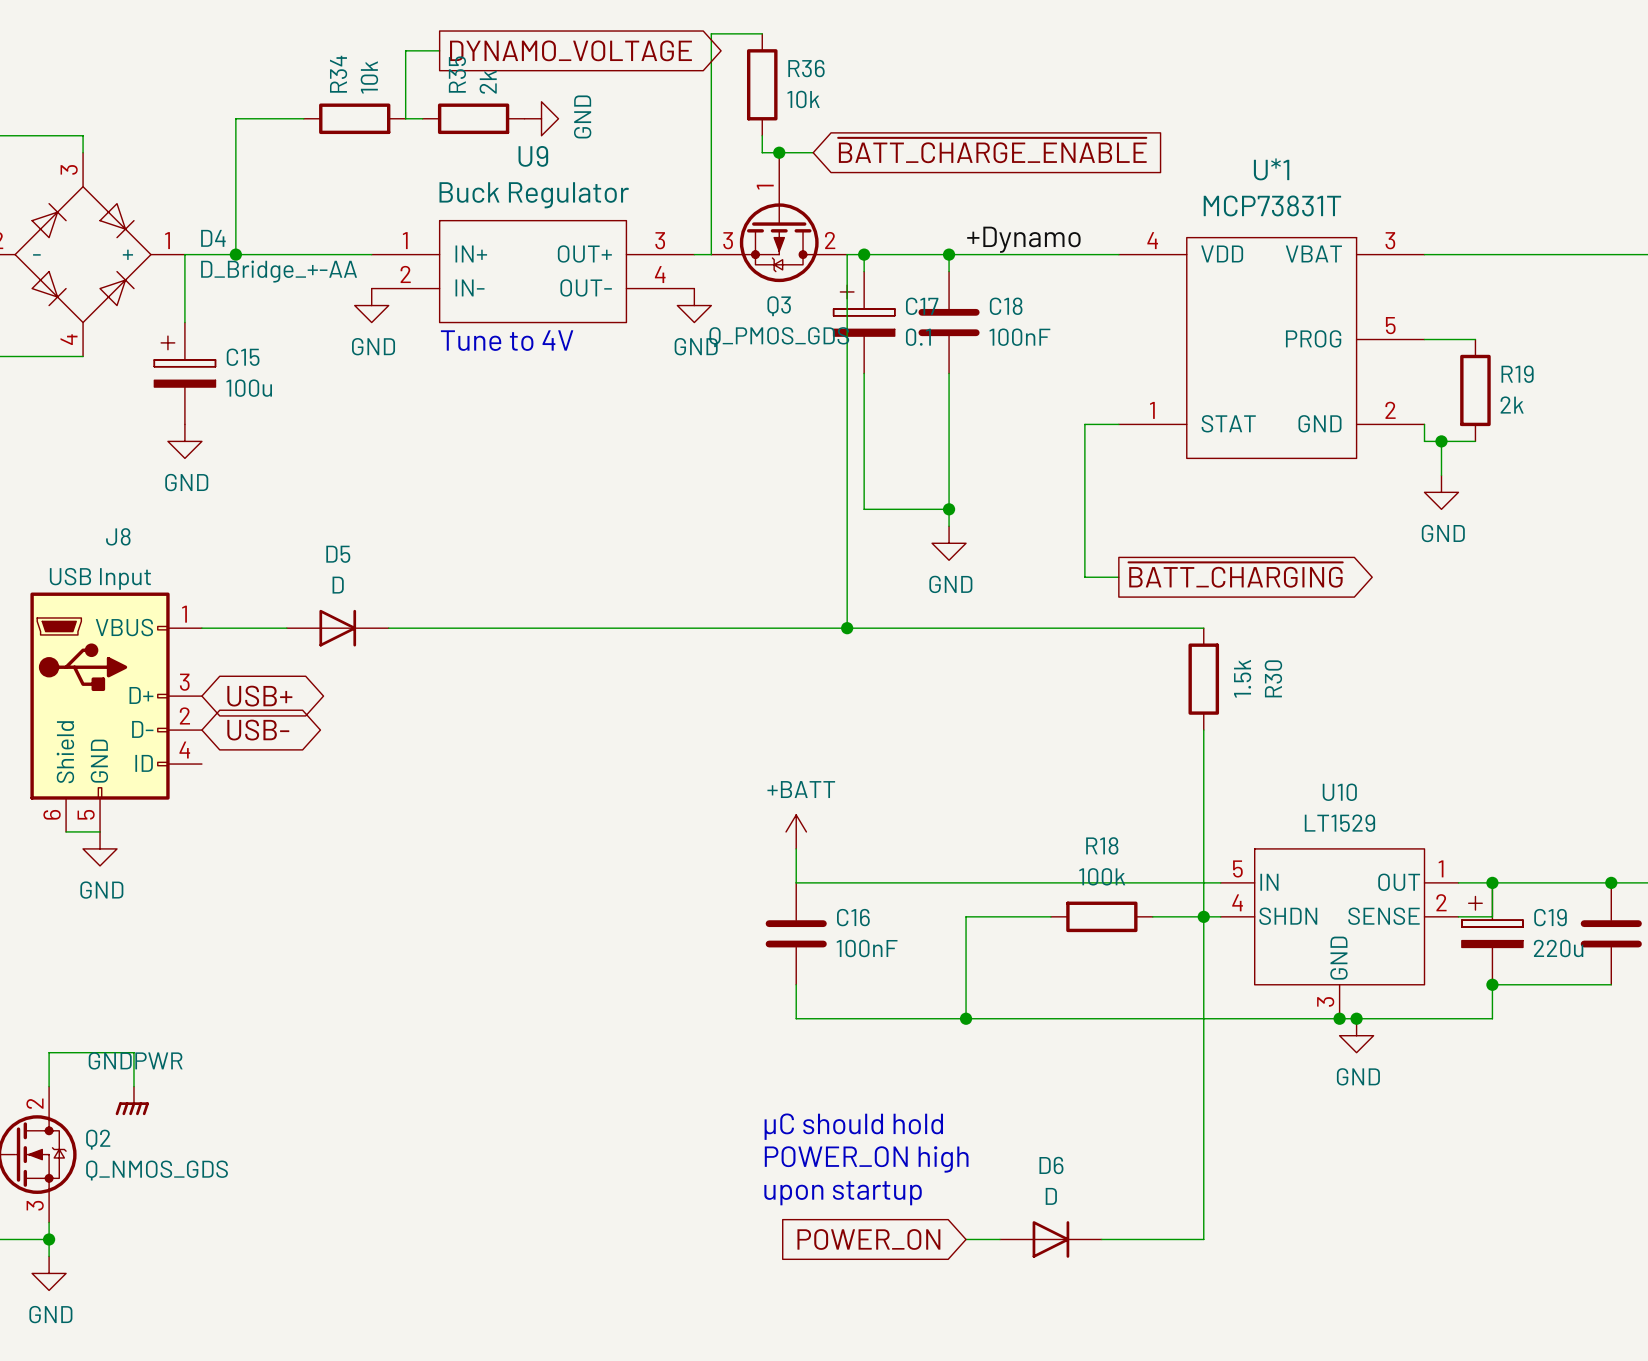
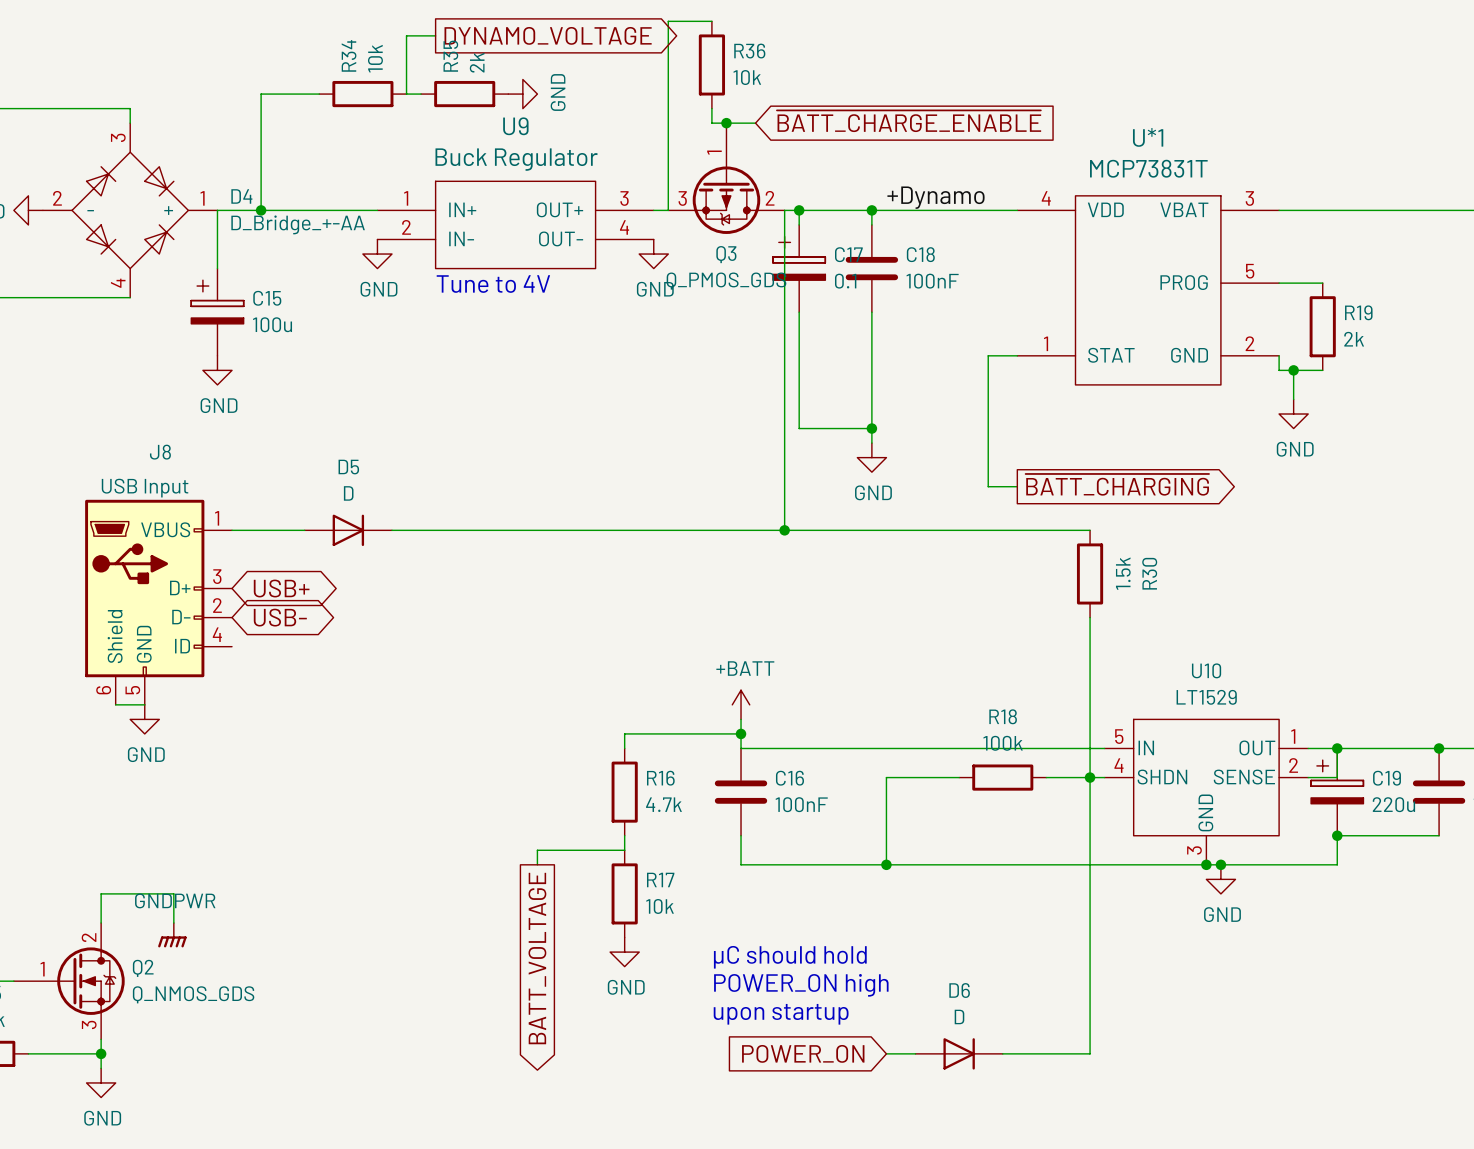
wire: none -> (741, 733) (624, 733) (624, 748)
junction: none -> (741, 733)
R16: none -> 4.7k (624, 792)
wire: none -> (624, 835) (624, 850) (537, 850) (537, 864)
R17: none -> 10k (624, 893)
power symbol: none -> GND (624, 952)
global label: none -> BATT_VOLTAGE (537, 958)

